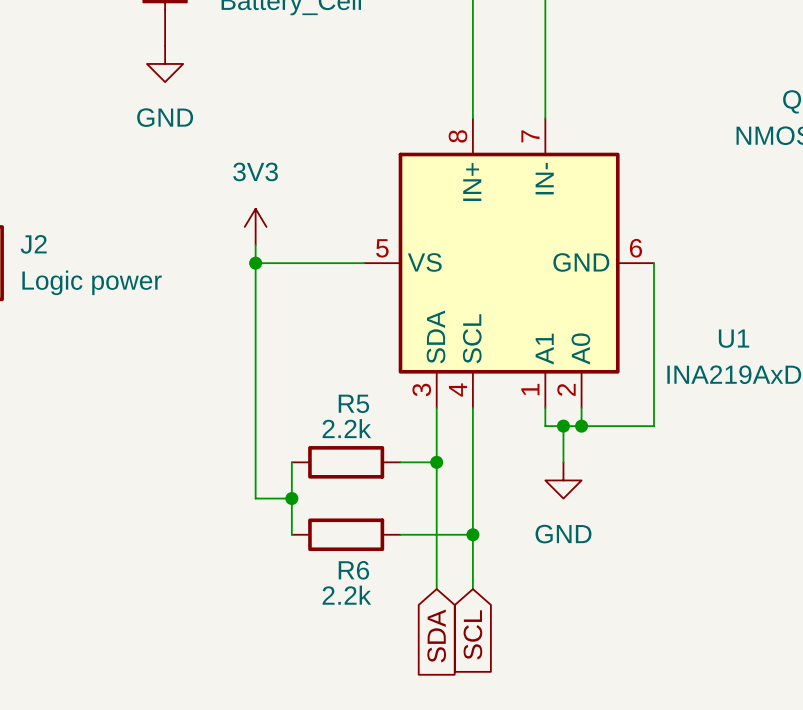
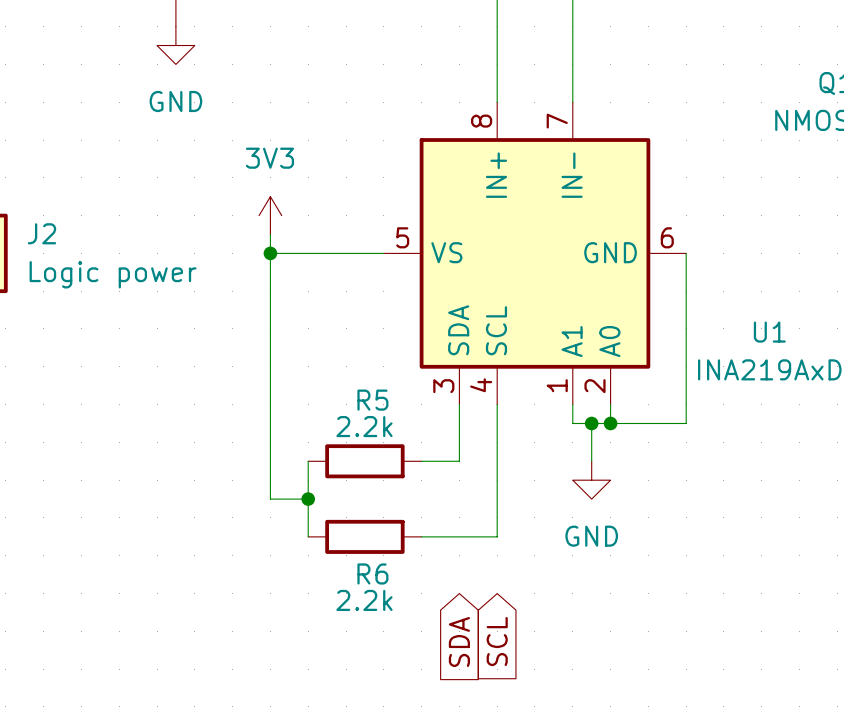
wire: (436, 462) (436, 589) -> none
junction: (436, 462) -> none
wire: (472, 534) (472, 589) -> none
junction: (472, 534) -> none

